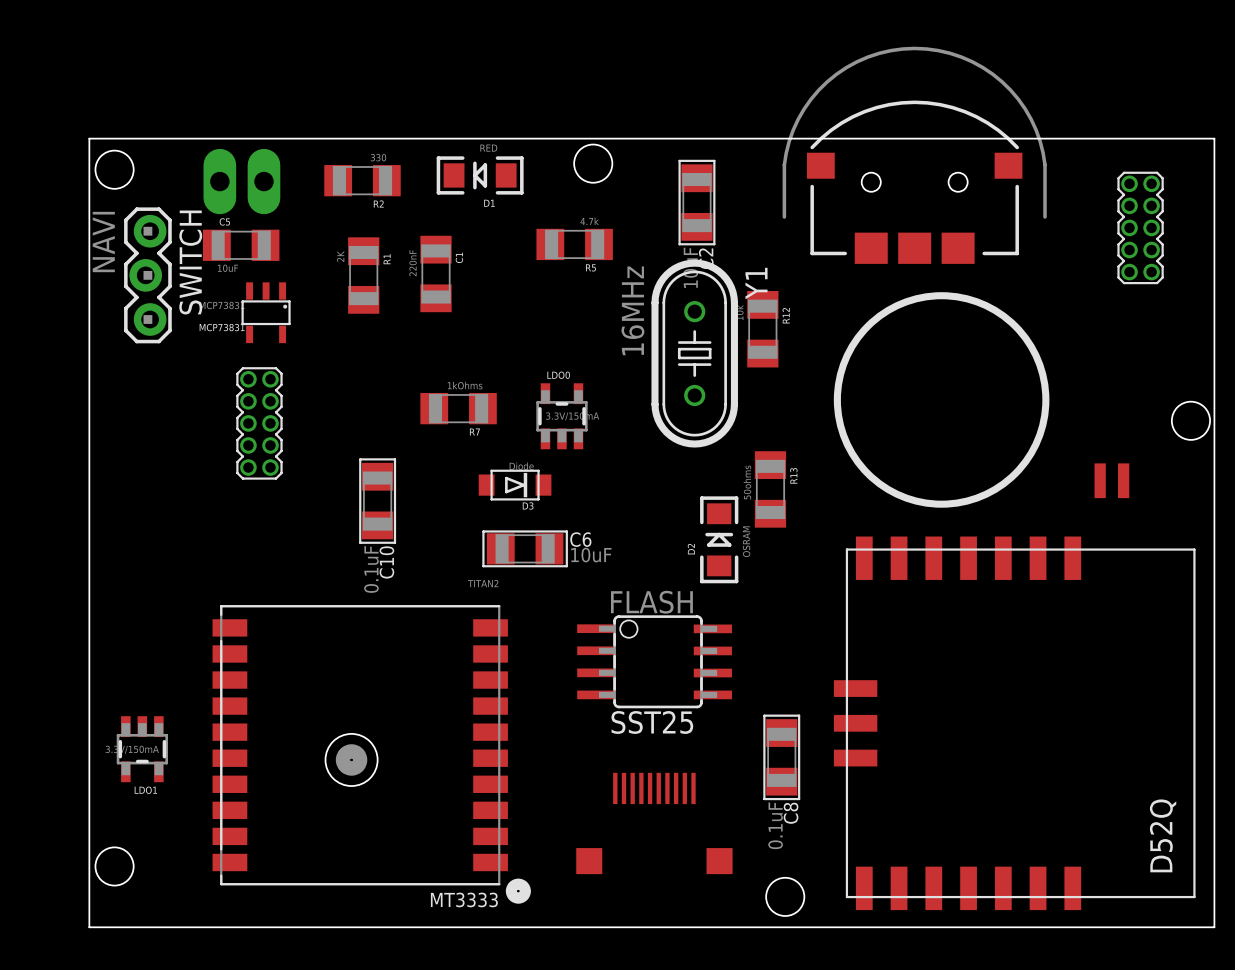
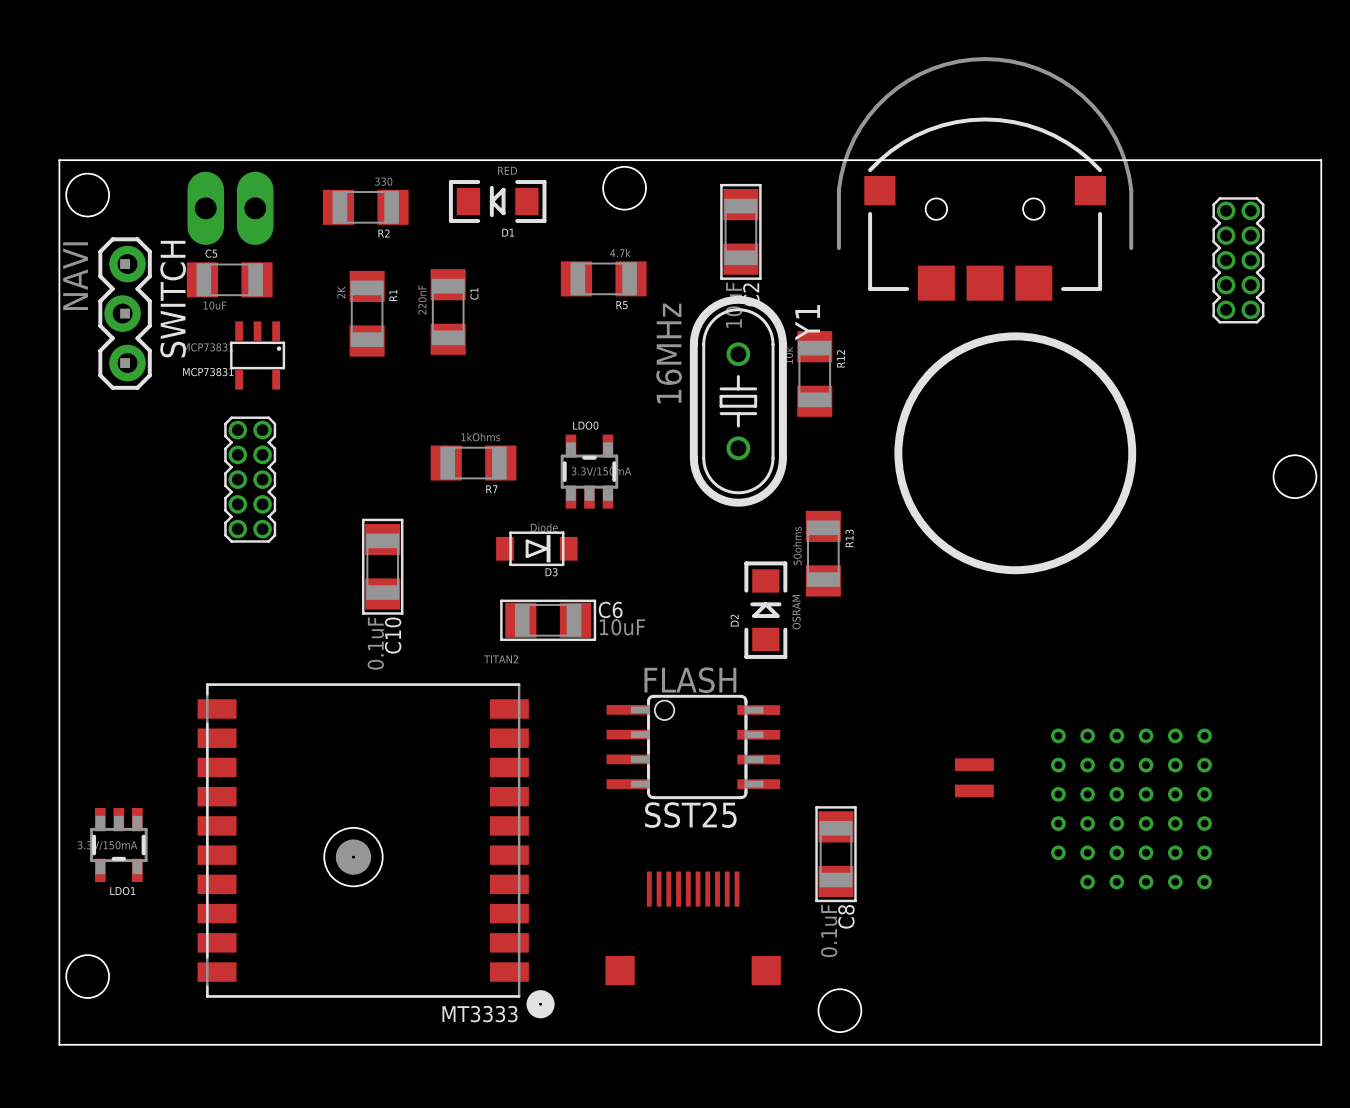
part rotation: 0° (1111, 480) -> 90° clockwise (974, 777)
part position: (1111, 480) -> (974, 777)
part: none -> (1131, 808)
part: (1014, 723) -> none

